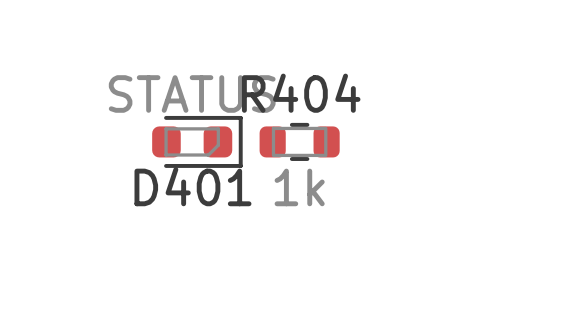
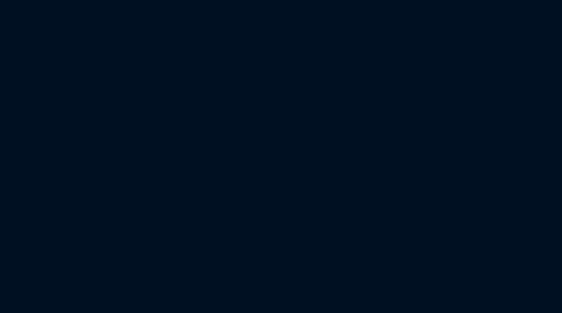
D401: STATUS (197, 141) -> none
R404: 1k (299, 141) -> none

